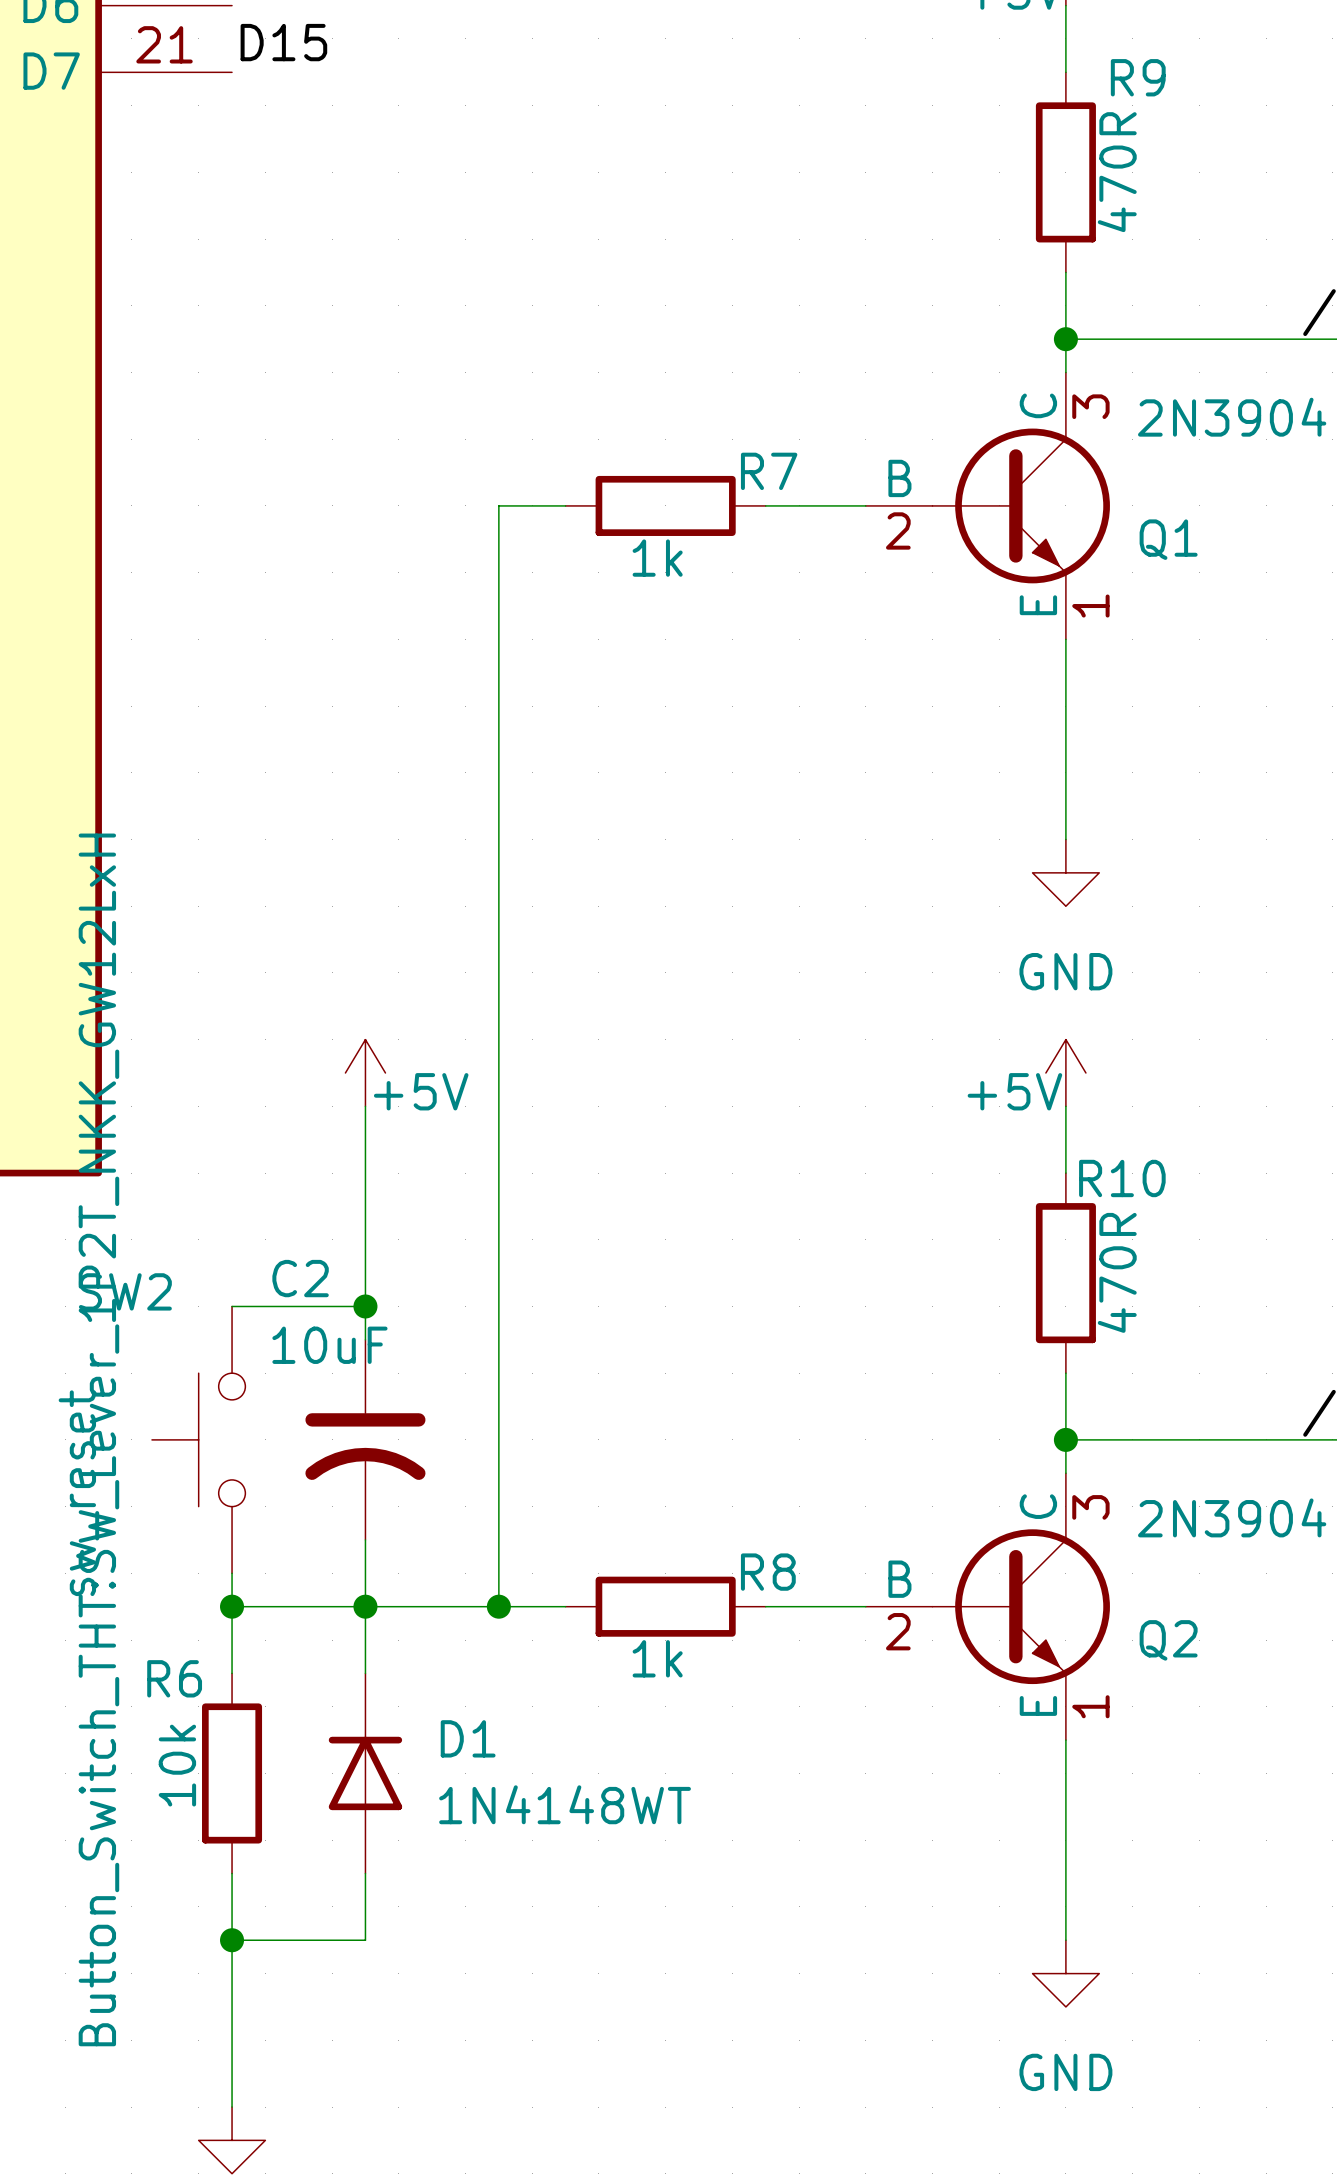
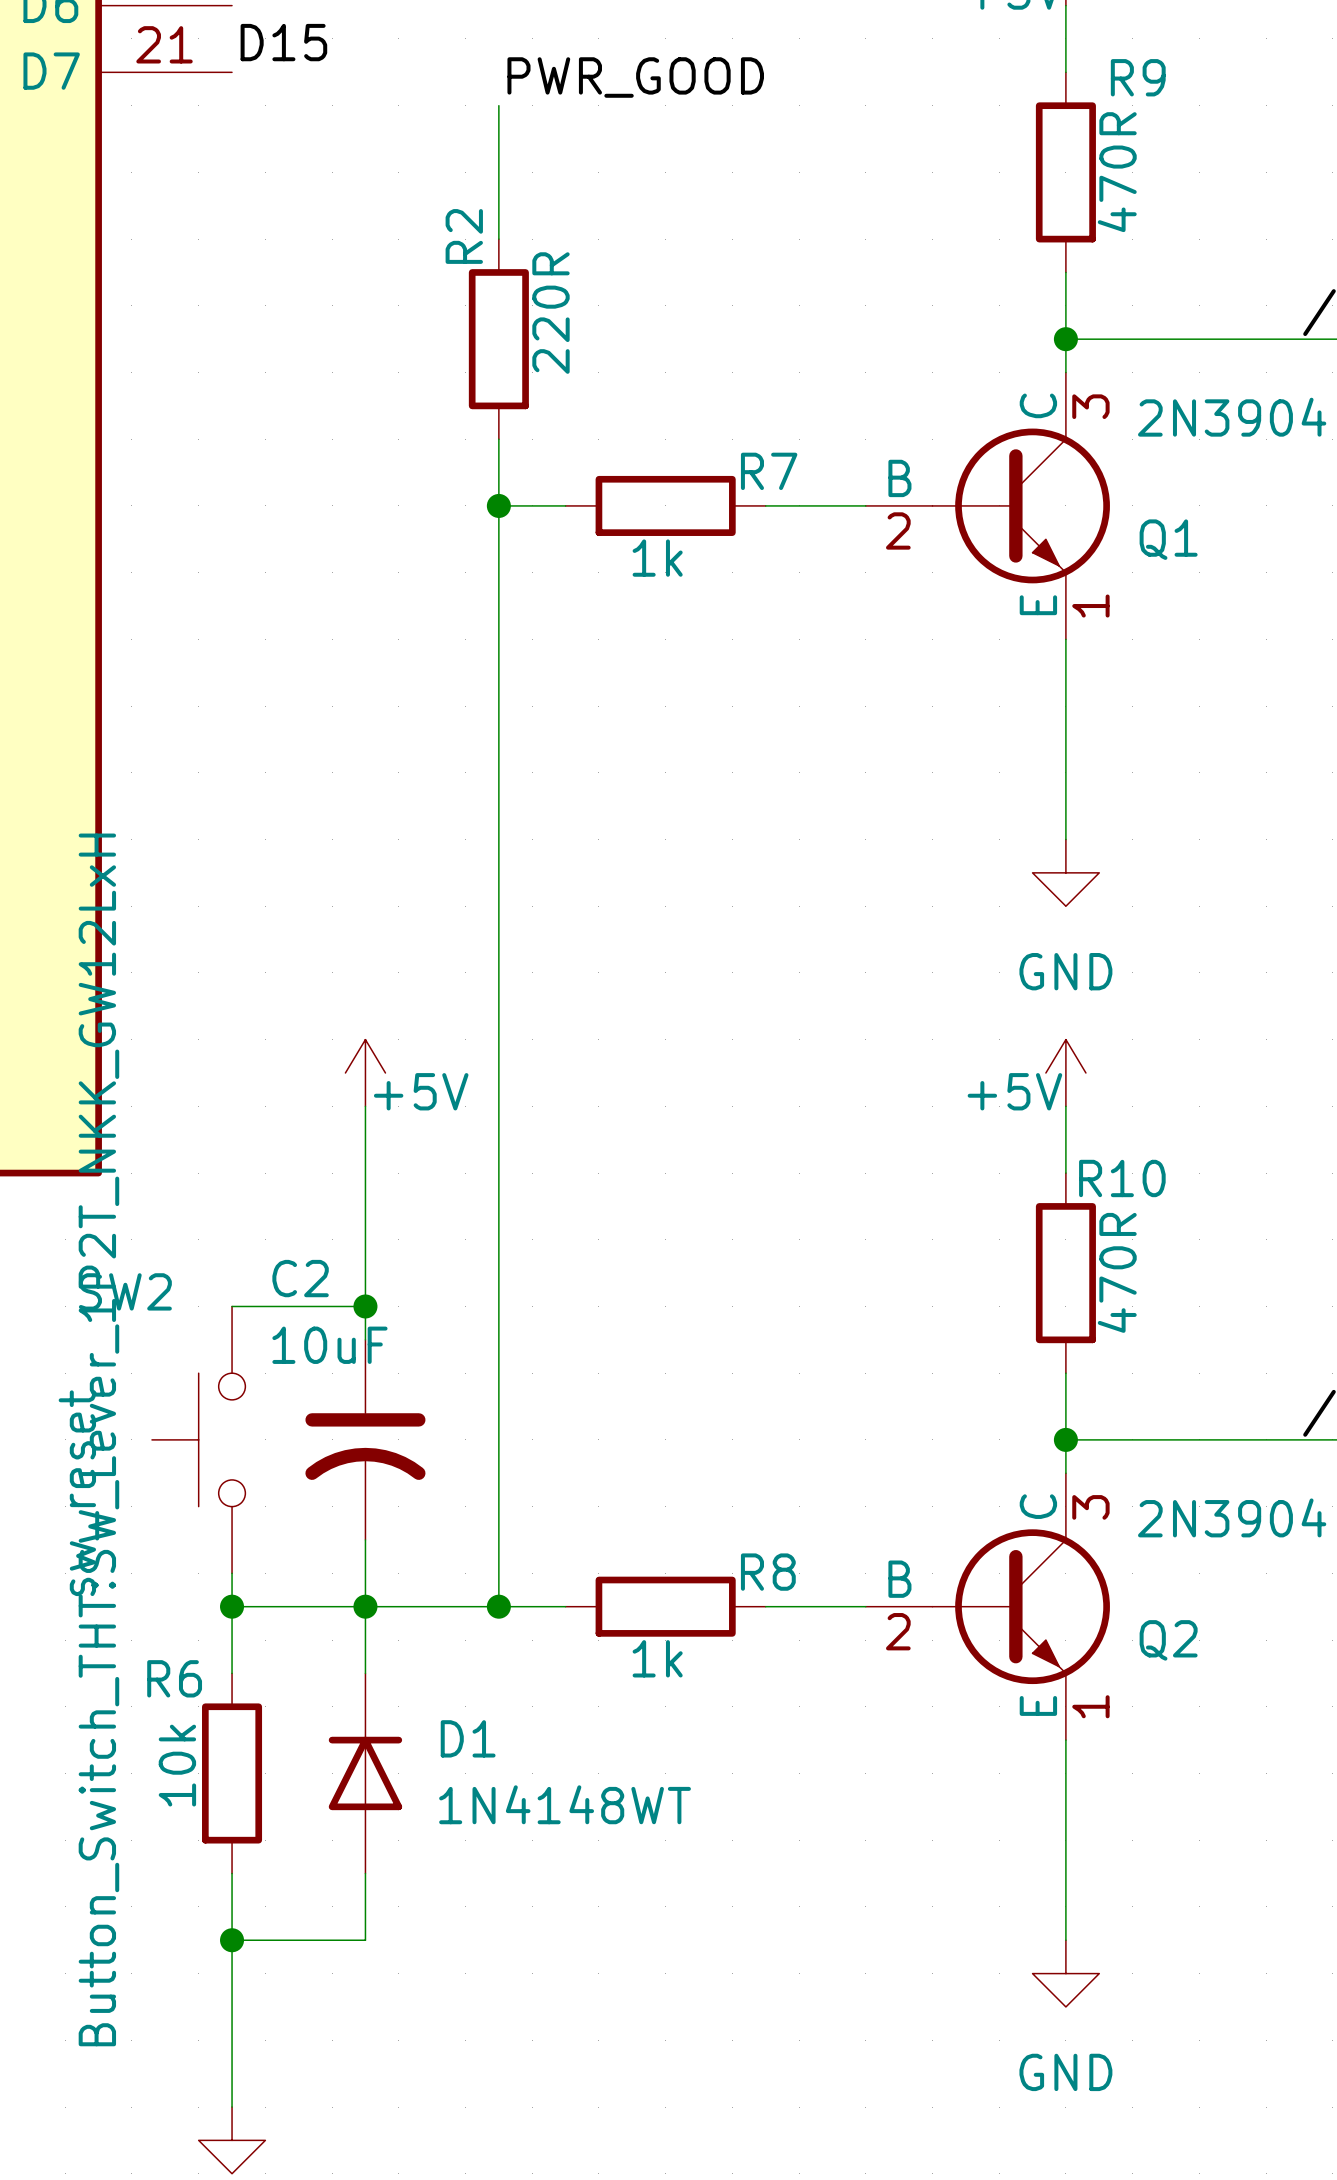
label: none -> PWR_GOOD (635, 77)
wire: none -> (498, 105) (498, 239)
R2: none -> 220R (498, 339)
wire: none -> (498, 439) (498, 505)
junction: none -> (498, 505)

